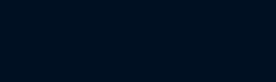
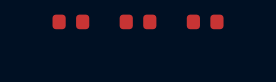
part: none -> (70, 21)
part: none -> (138, 21)
part: none -> (205, 21)

